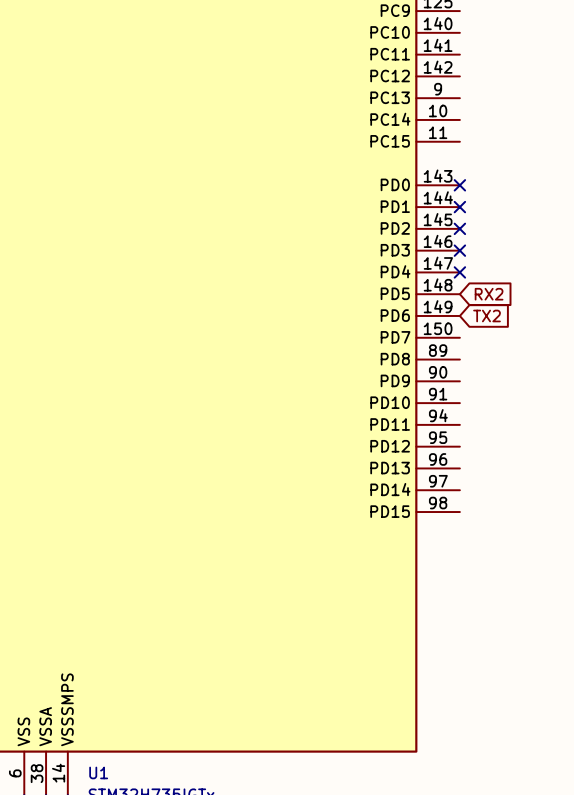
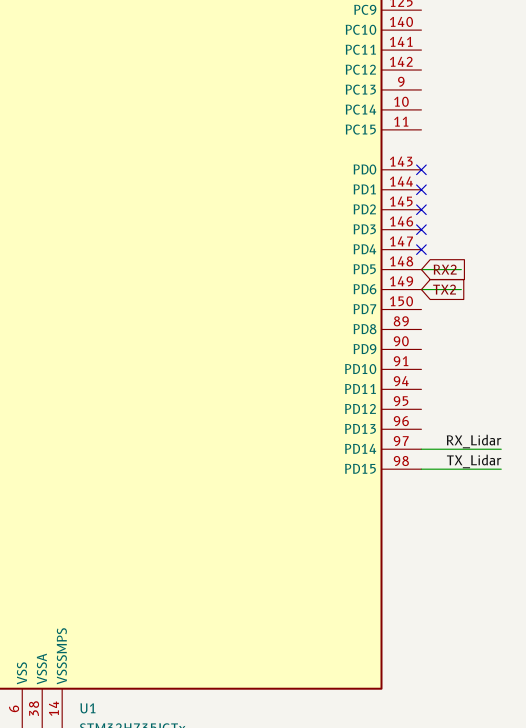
wire: none -> (421, 269) (461, 269)
wire: none -> (421, 289) (461, 289)
label: none -> RX_Lidar (474, 441)
wire: none -> (421, 449) (501, 449)
label: none -> TX_Lidar (474, 461)
wire: none -> (421, 469) (501, 469)

